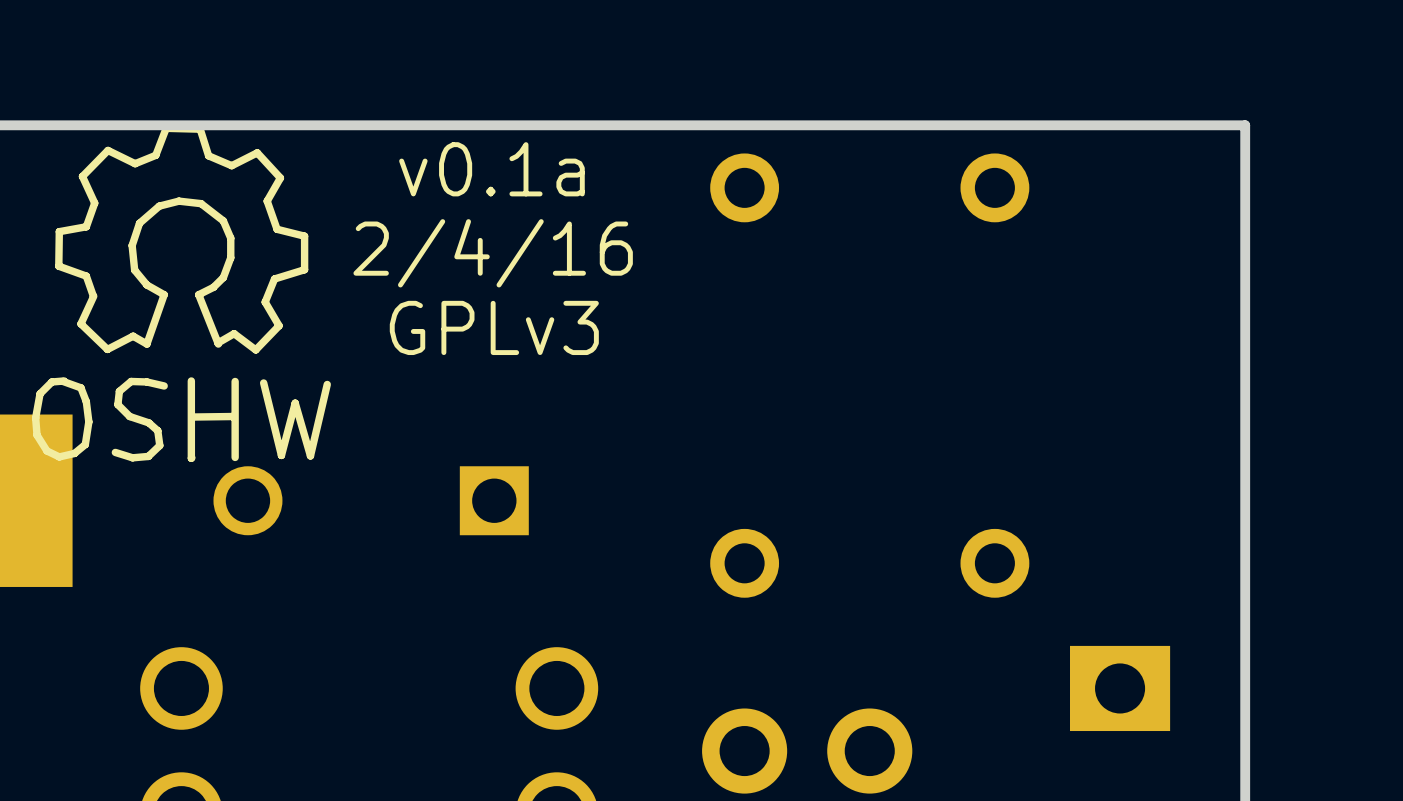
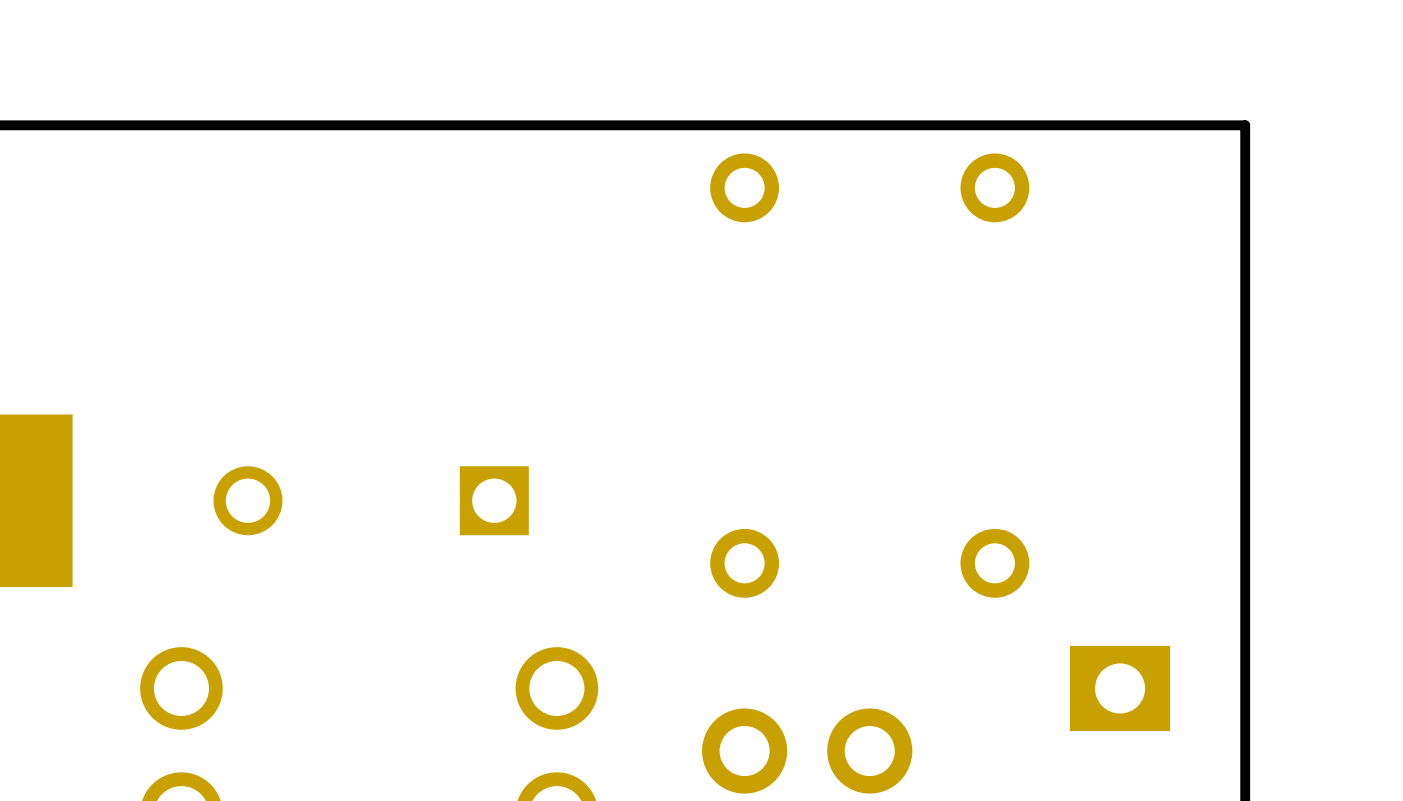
drawing: [31, 124, 331, 463] -> none
text: v0.1a (491, 169) -> none
text: 2/4/16 (493, 253) -> none
text: GPLv3 (494, 327) -> none

